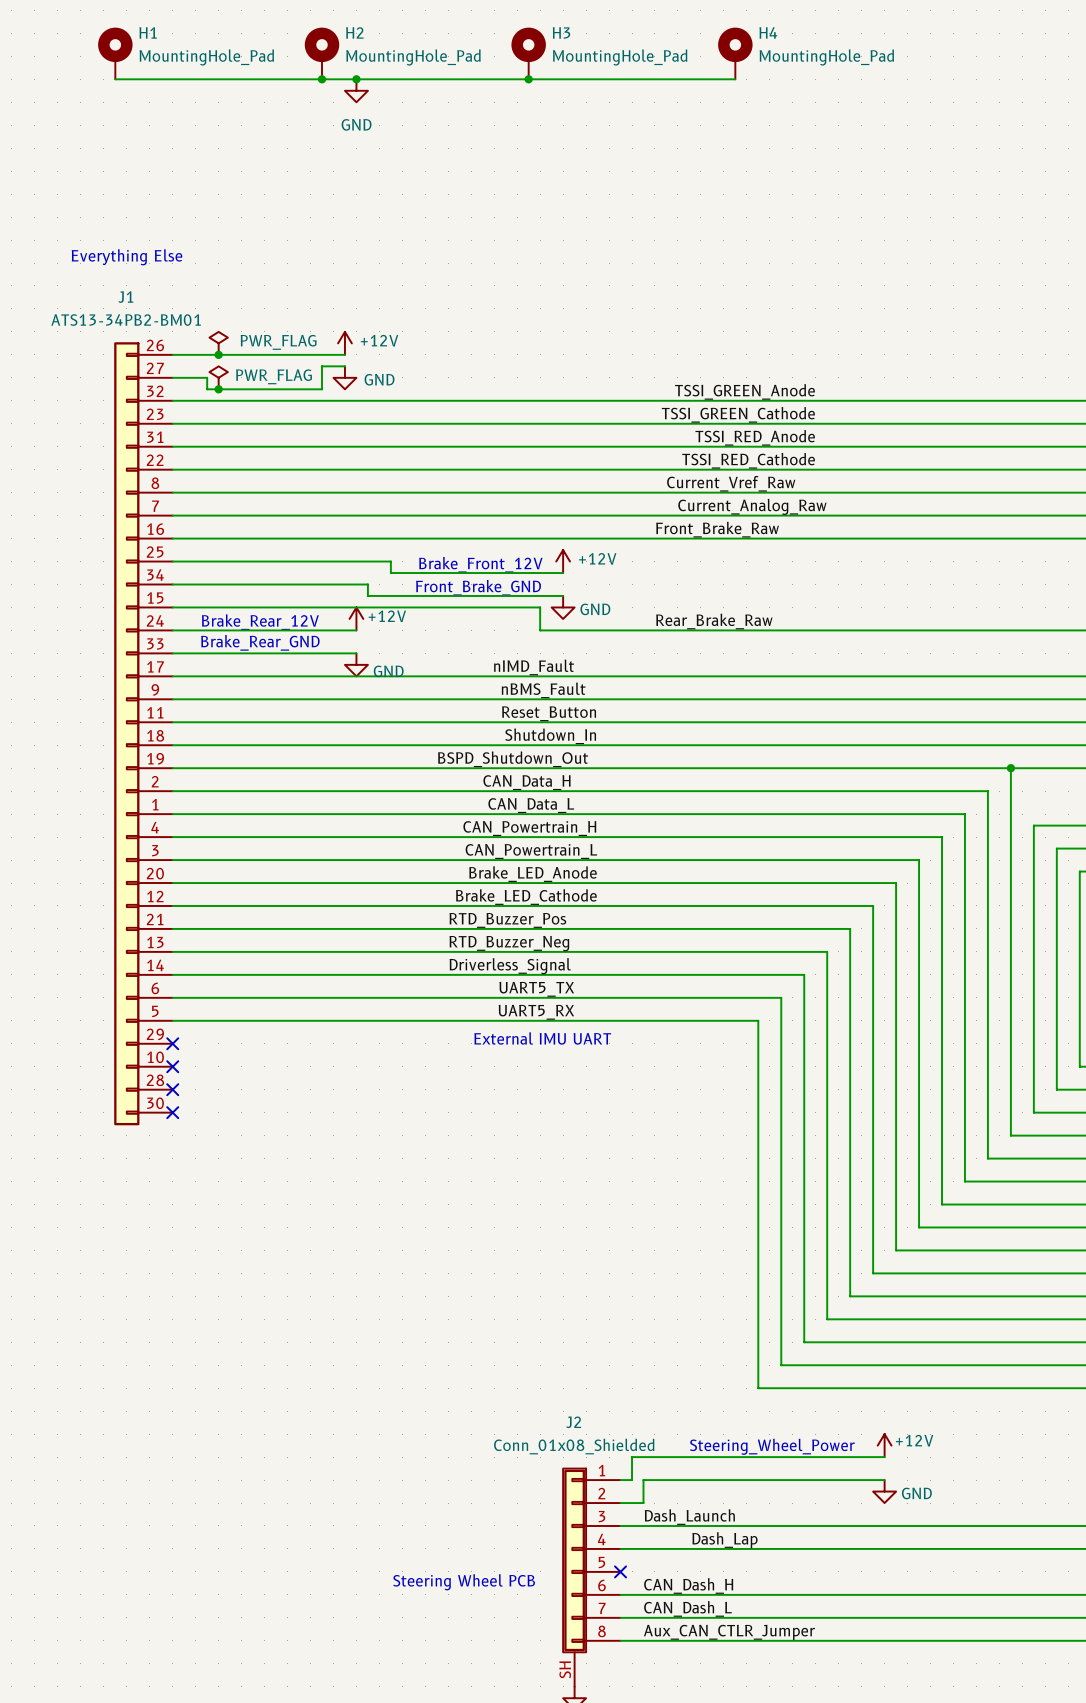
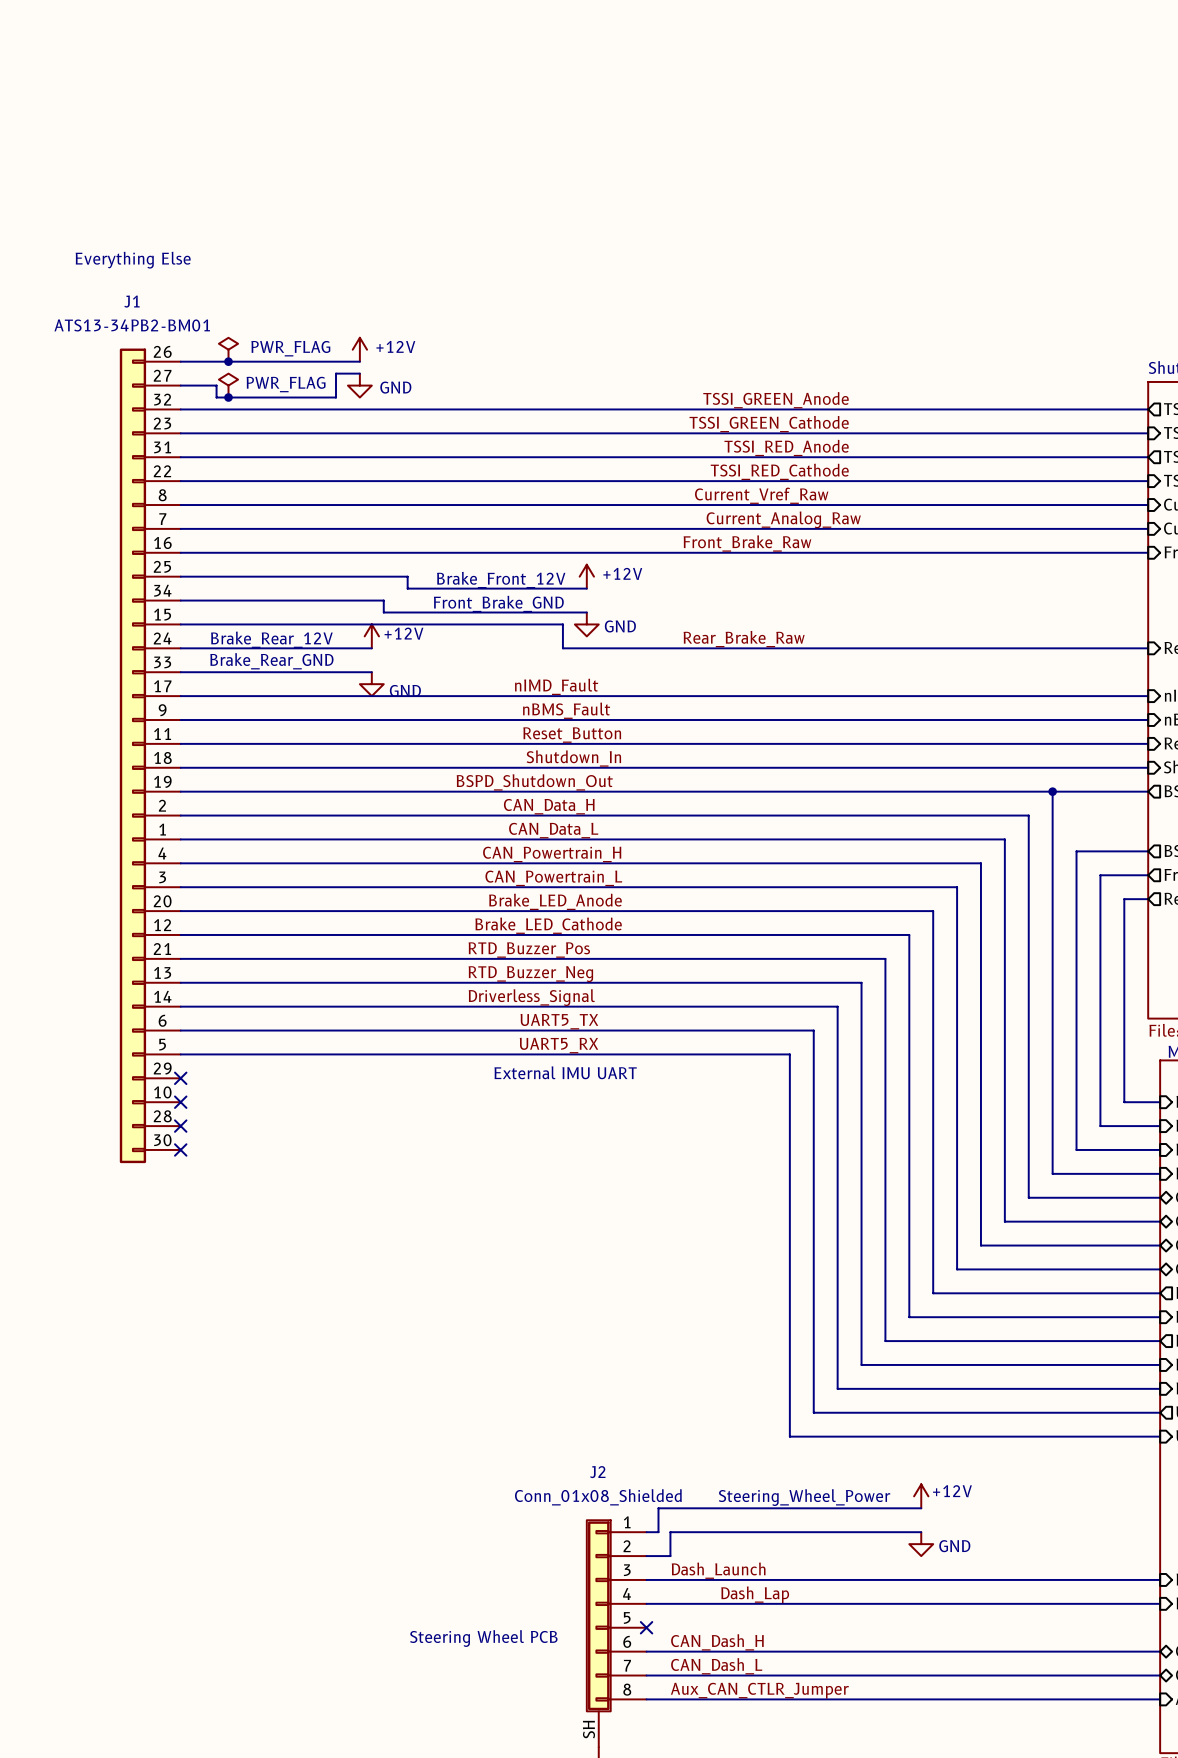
H1: MountingHole_Pad (115, 53) -> none
H2: MountingHole_Pad (322, 53) -> none
H3: MountingHole_Pad (528, 53) -> none
H4: MountingHole_Pad (735, 53) -> none
wire: (115, 79) (735, 79) -> none
junction: (322, 79) -> none
junction: (356, 79) -> none
junction: (528, 79) -> none
power symbol: GND (356, 90) -> none

